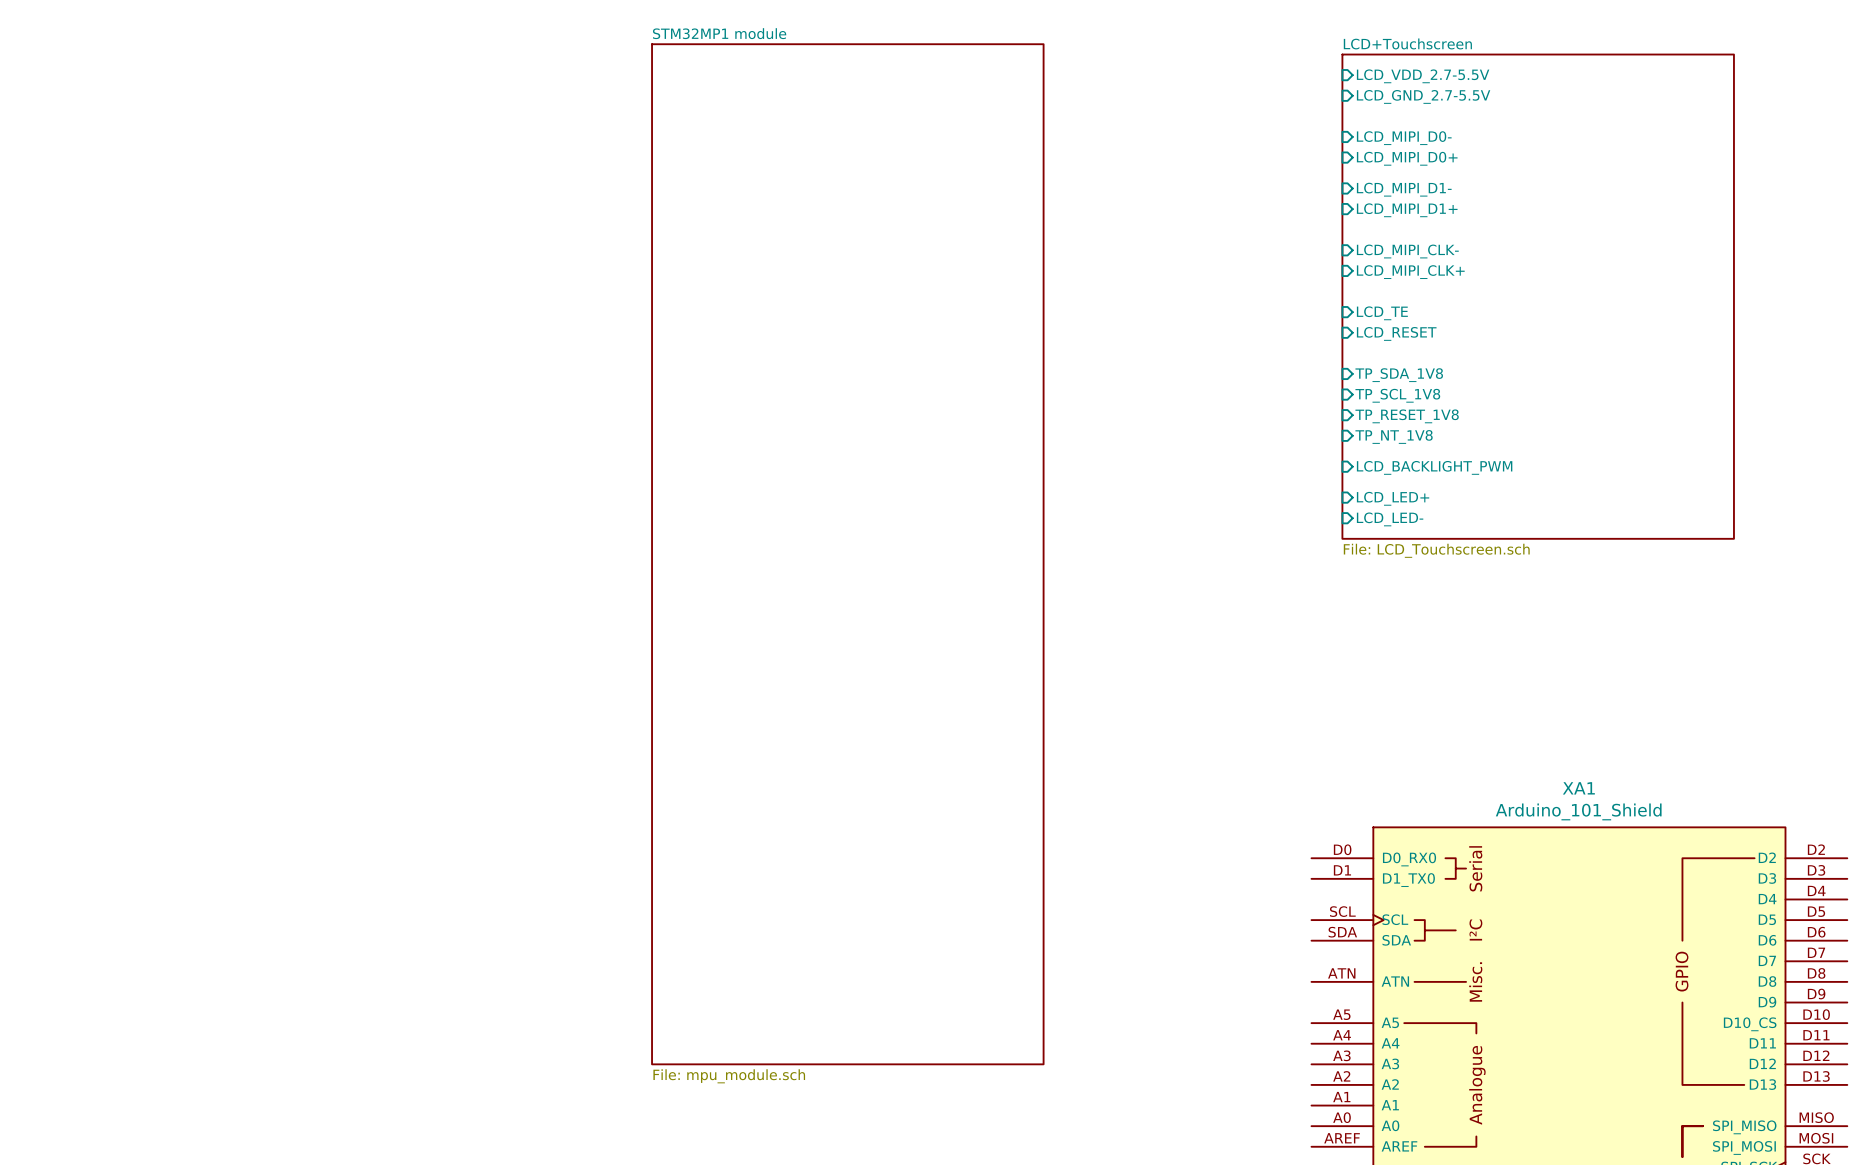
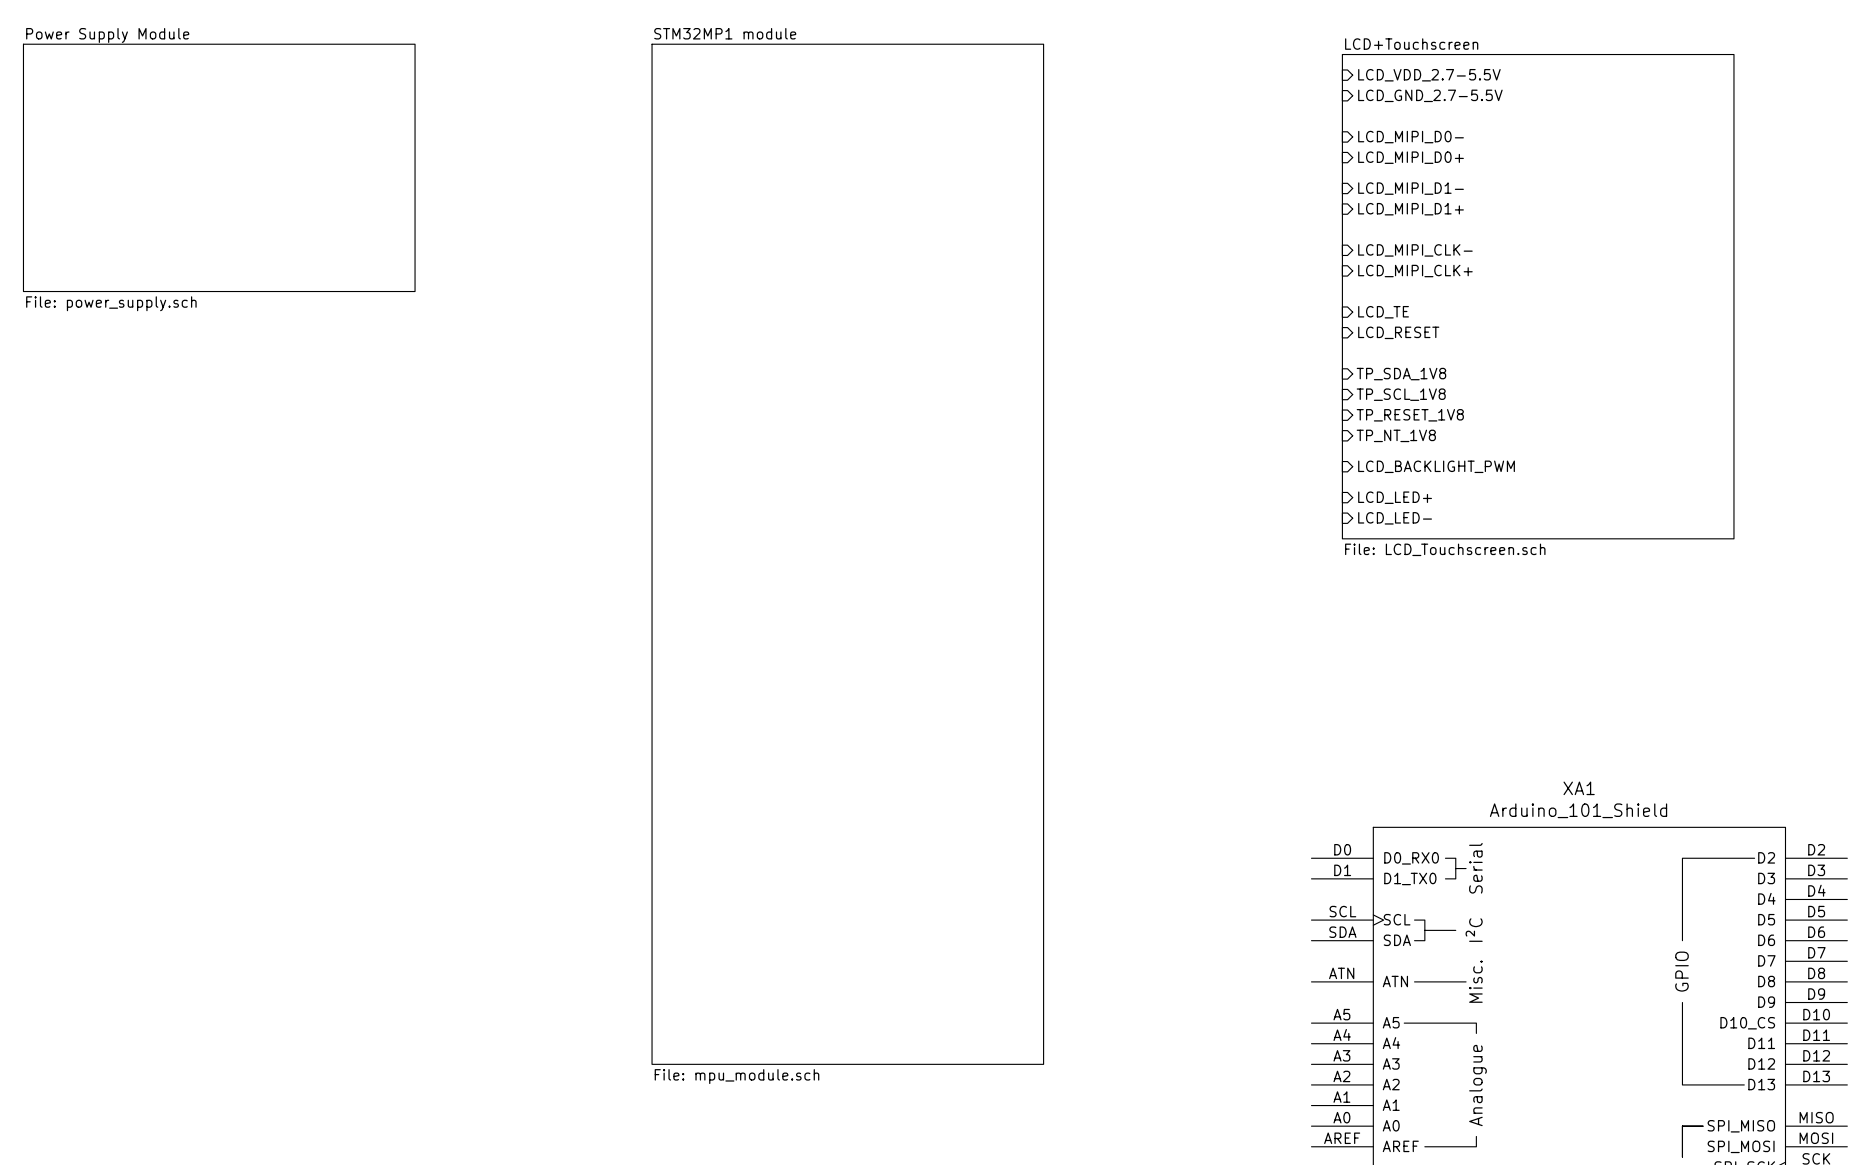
sheet Power Supply Module: none -> File: power_supply.sch (219, 167)

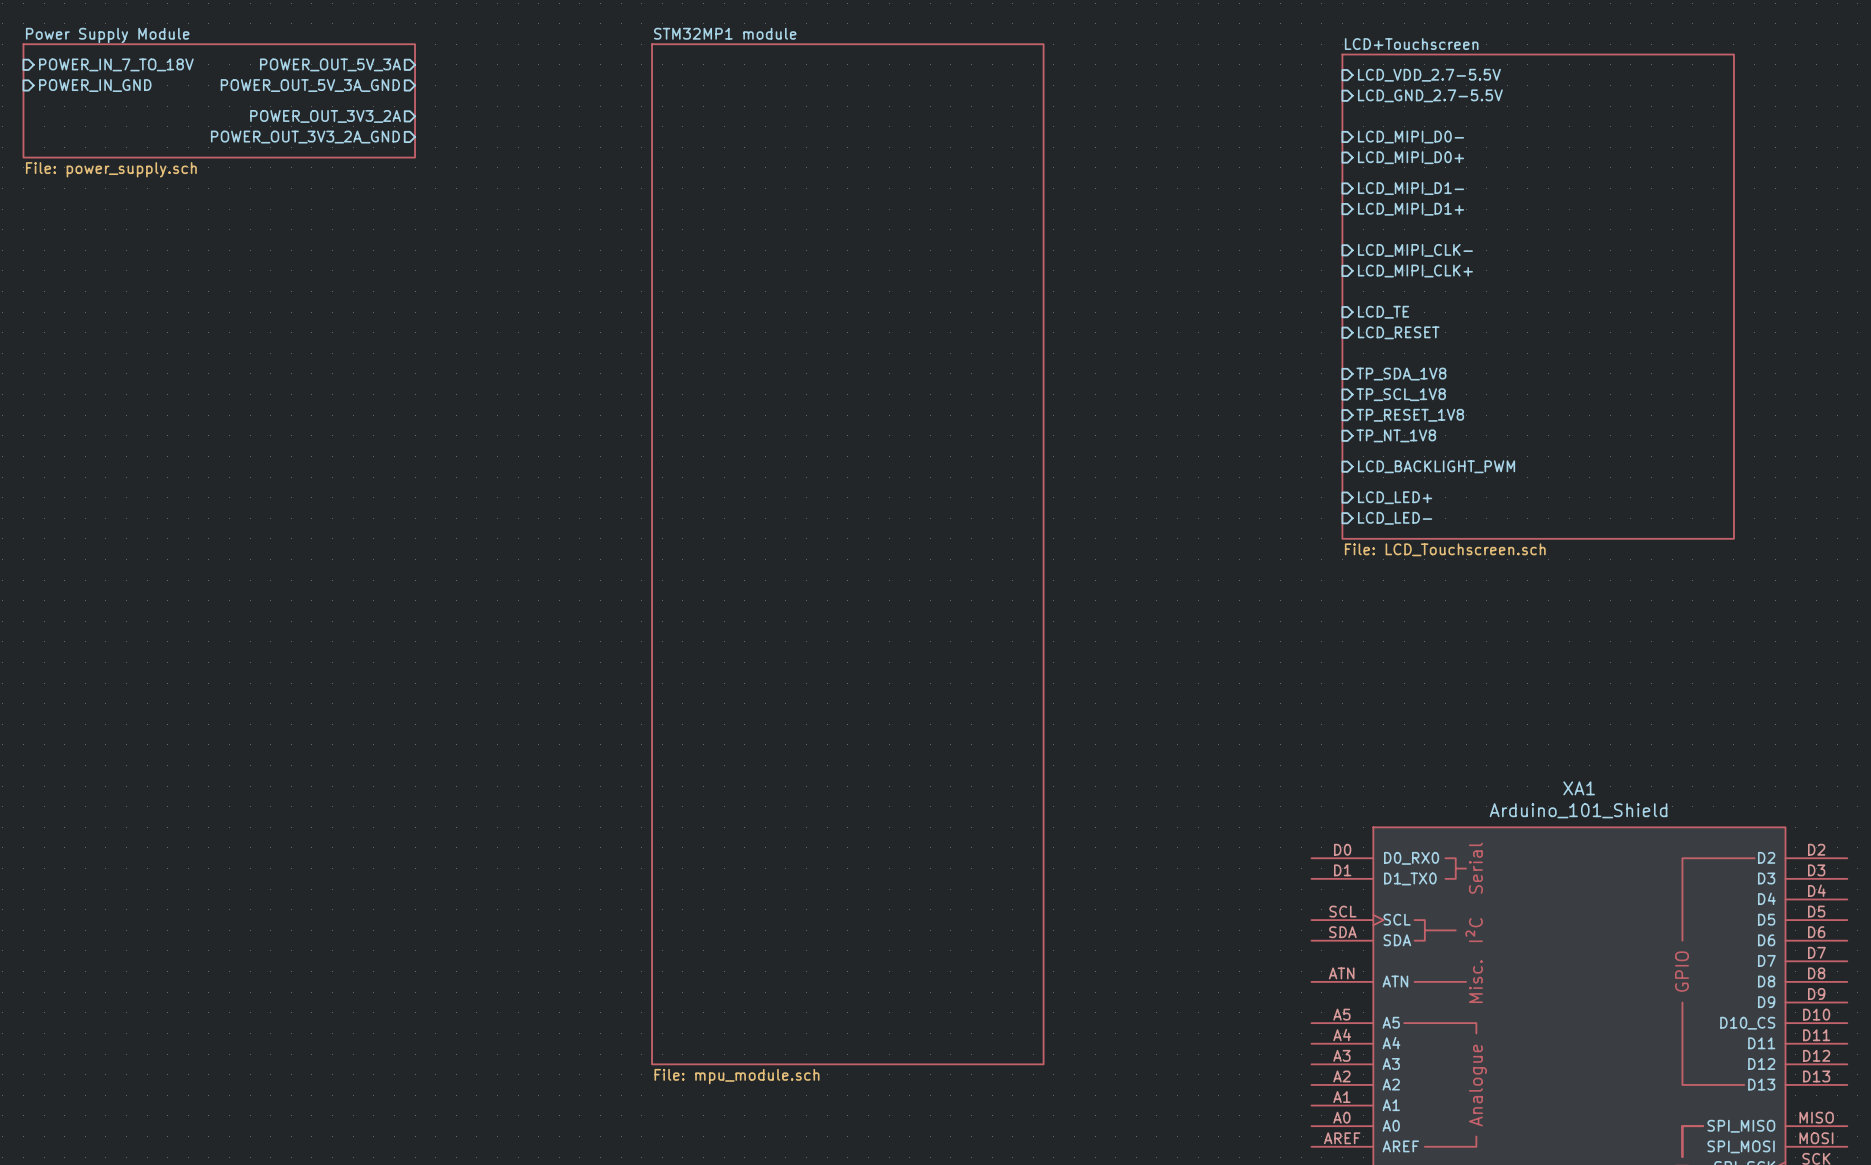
sheet pin: none -> POWER_IN_7_TO_18V (116, 64)
sheet pin: none -> POWER_OUT_5V_3A (330, 64)
sheet pin: none -> POWER_IN_GND (95, 85)
sheet pin: none -> POWER_OUT_5V_3A_GND (310, 85)
sheet Power Supply Module: none -> File: power_supply.sch (219, 100)
sheet pin: none -> POWER_OUT_3V3_2A (325, 116)
sheet pin: none -> POWER_OUT_3V3_2A_GND (305, 137)
sheet Power Supply Module: File: power_supply.sch (219, 167) -> none

